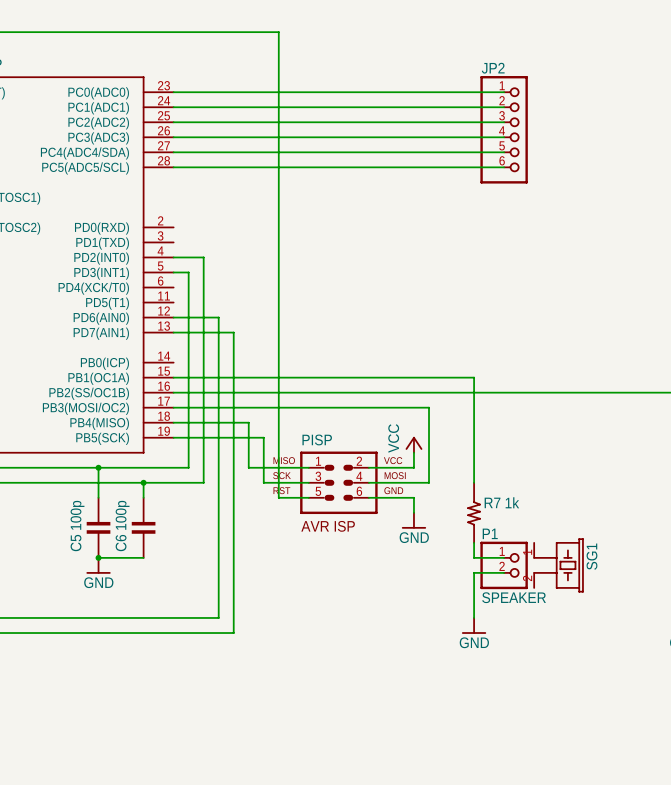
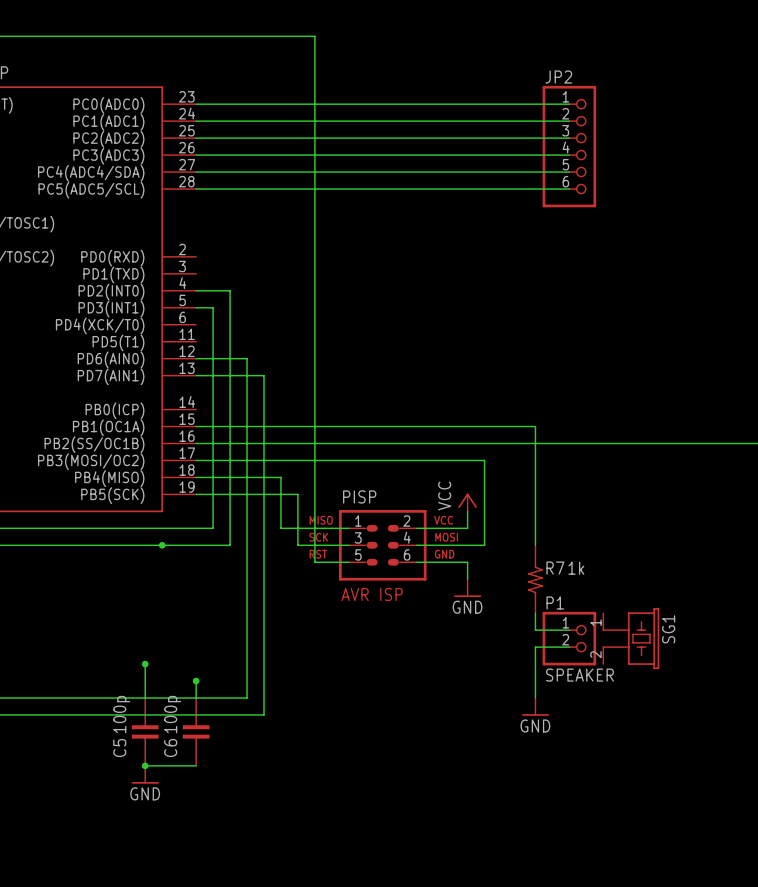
wire: (98, 467) (98, 497) -> (145, 664) (145, 698)
junction: (98, 467) -> none
wire: (143, 482) (143, 497) -> (196, 681) (196, 698)
C5 position: (98, 527) -> (145, 731)
C6 position: (143, 527) -> (196, 731)
wire: (98, 557) (143, 557) -> (145, 765) (196, 765)
junction: (98, 557) -> none
power symbol position: GND (98, 565) -> GND (145, 774)
junction: none -> (145, 664)
junction: none -> (196, 681)
junction: none -> (145, 765)

